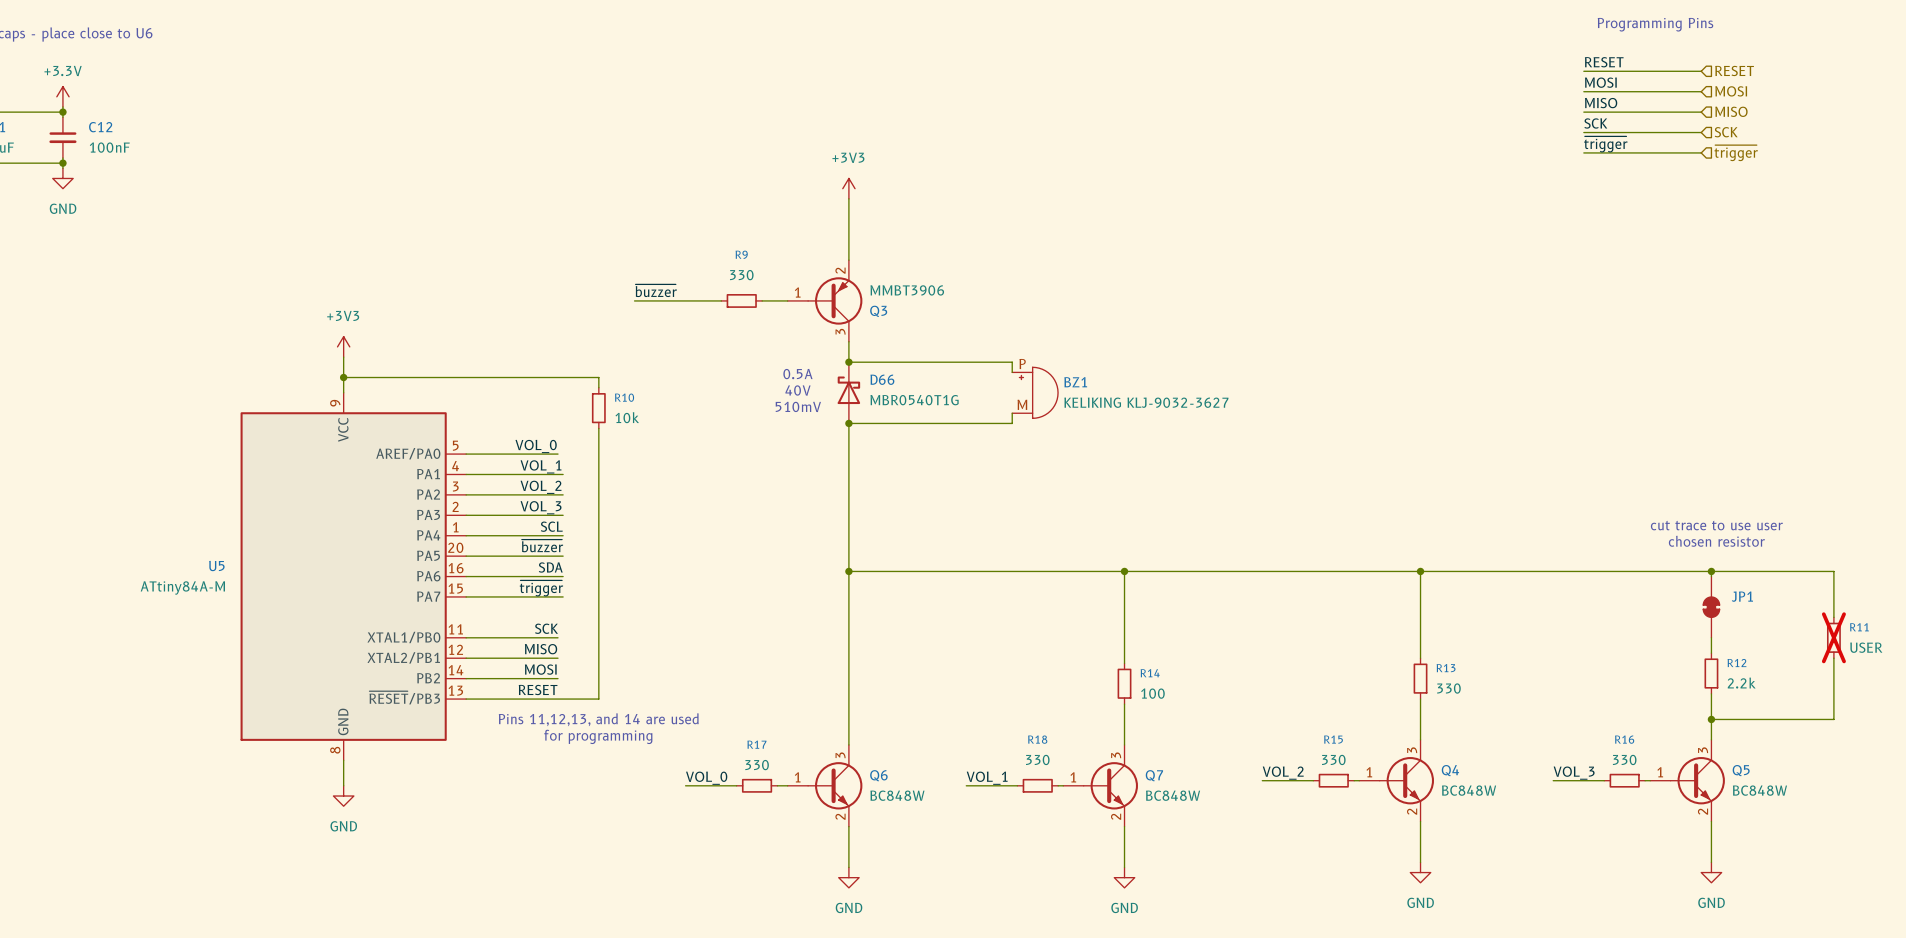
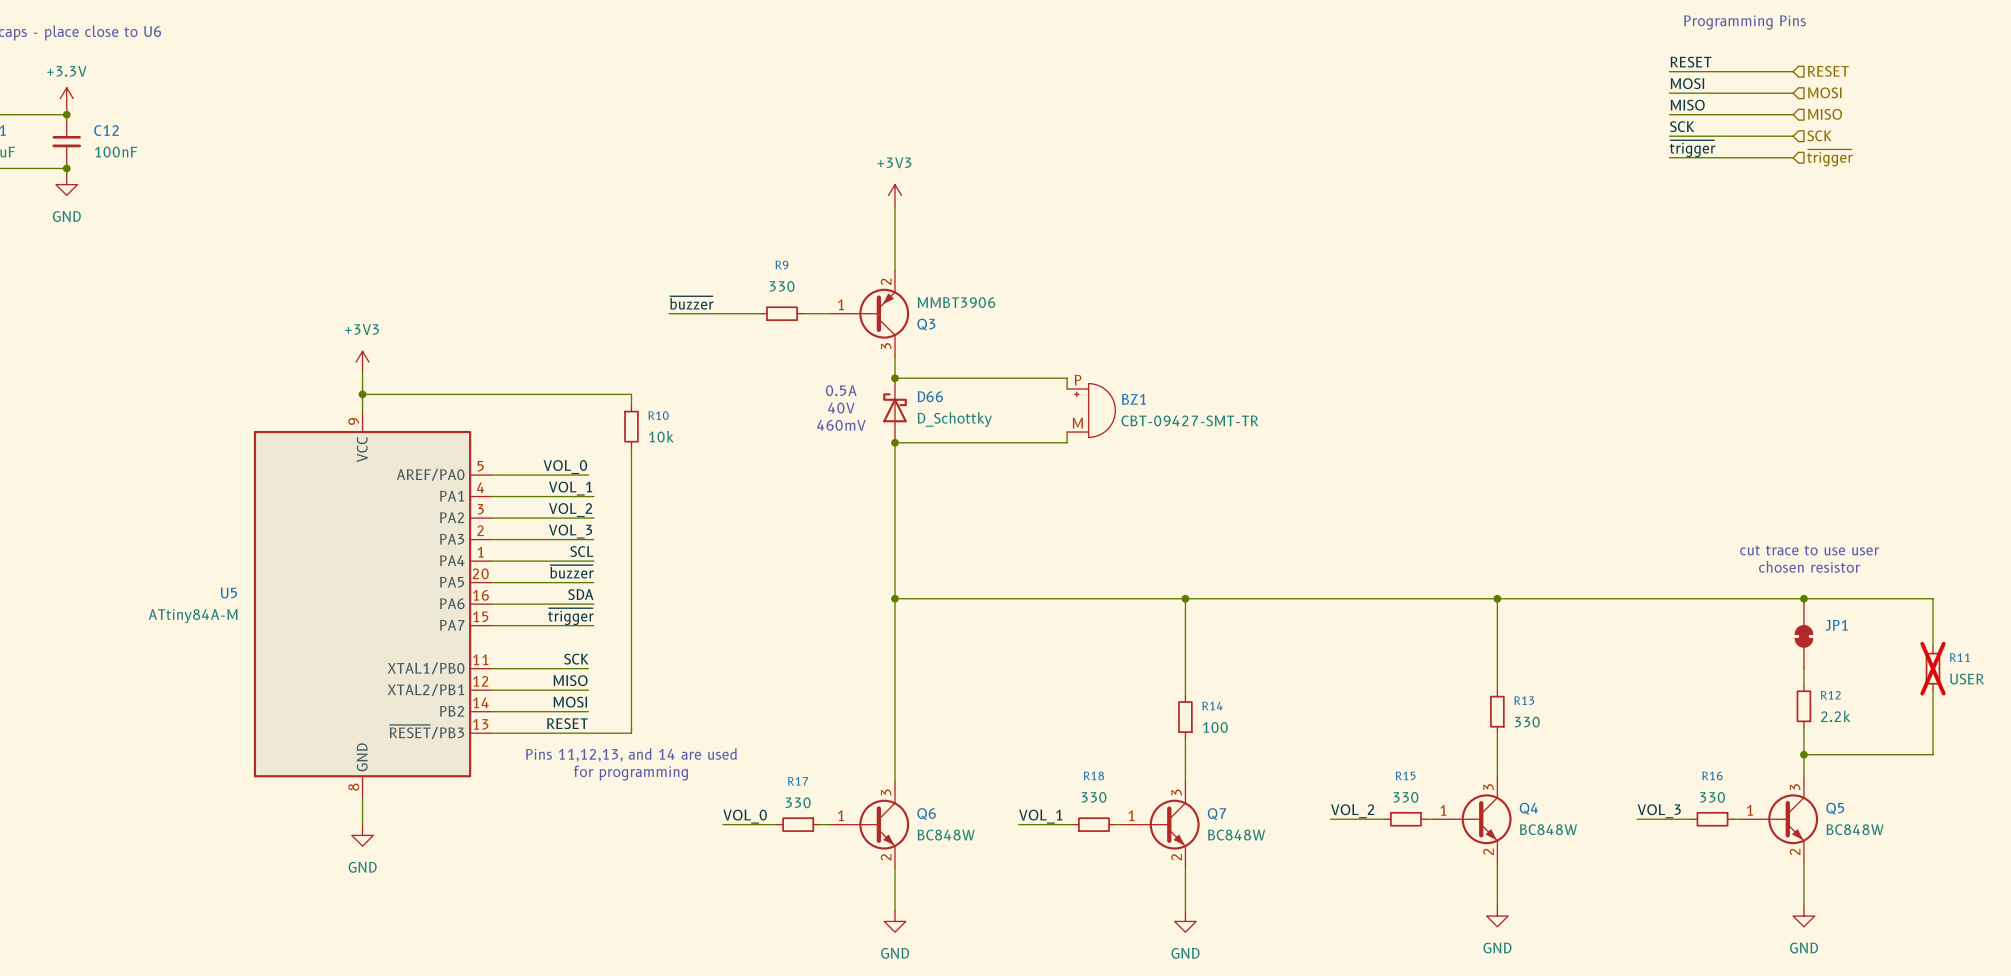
D66 value: MBR0540T1G (914, 400) -> D_Schottky (954, 419)
BZ1 value: KELIKING KLJ-9032-3627 (1146, 402) -> CBT-09427-SMT-TR (1189, 420)
text: 510mV (798, 406) -> 460mV (841, 425)

